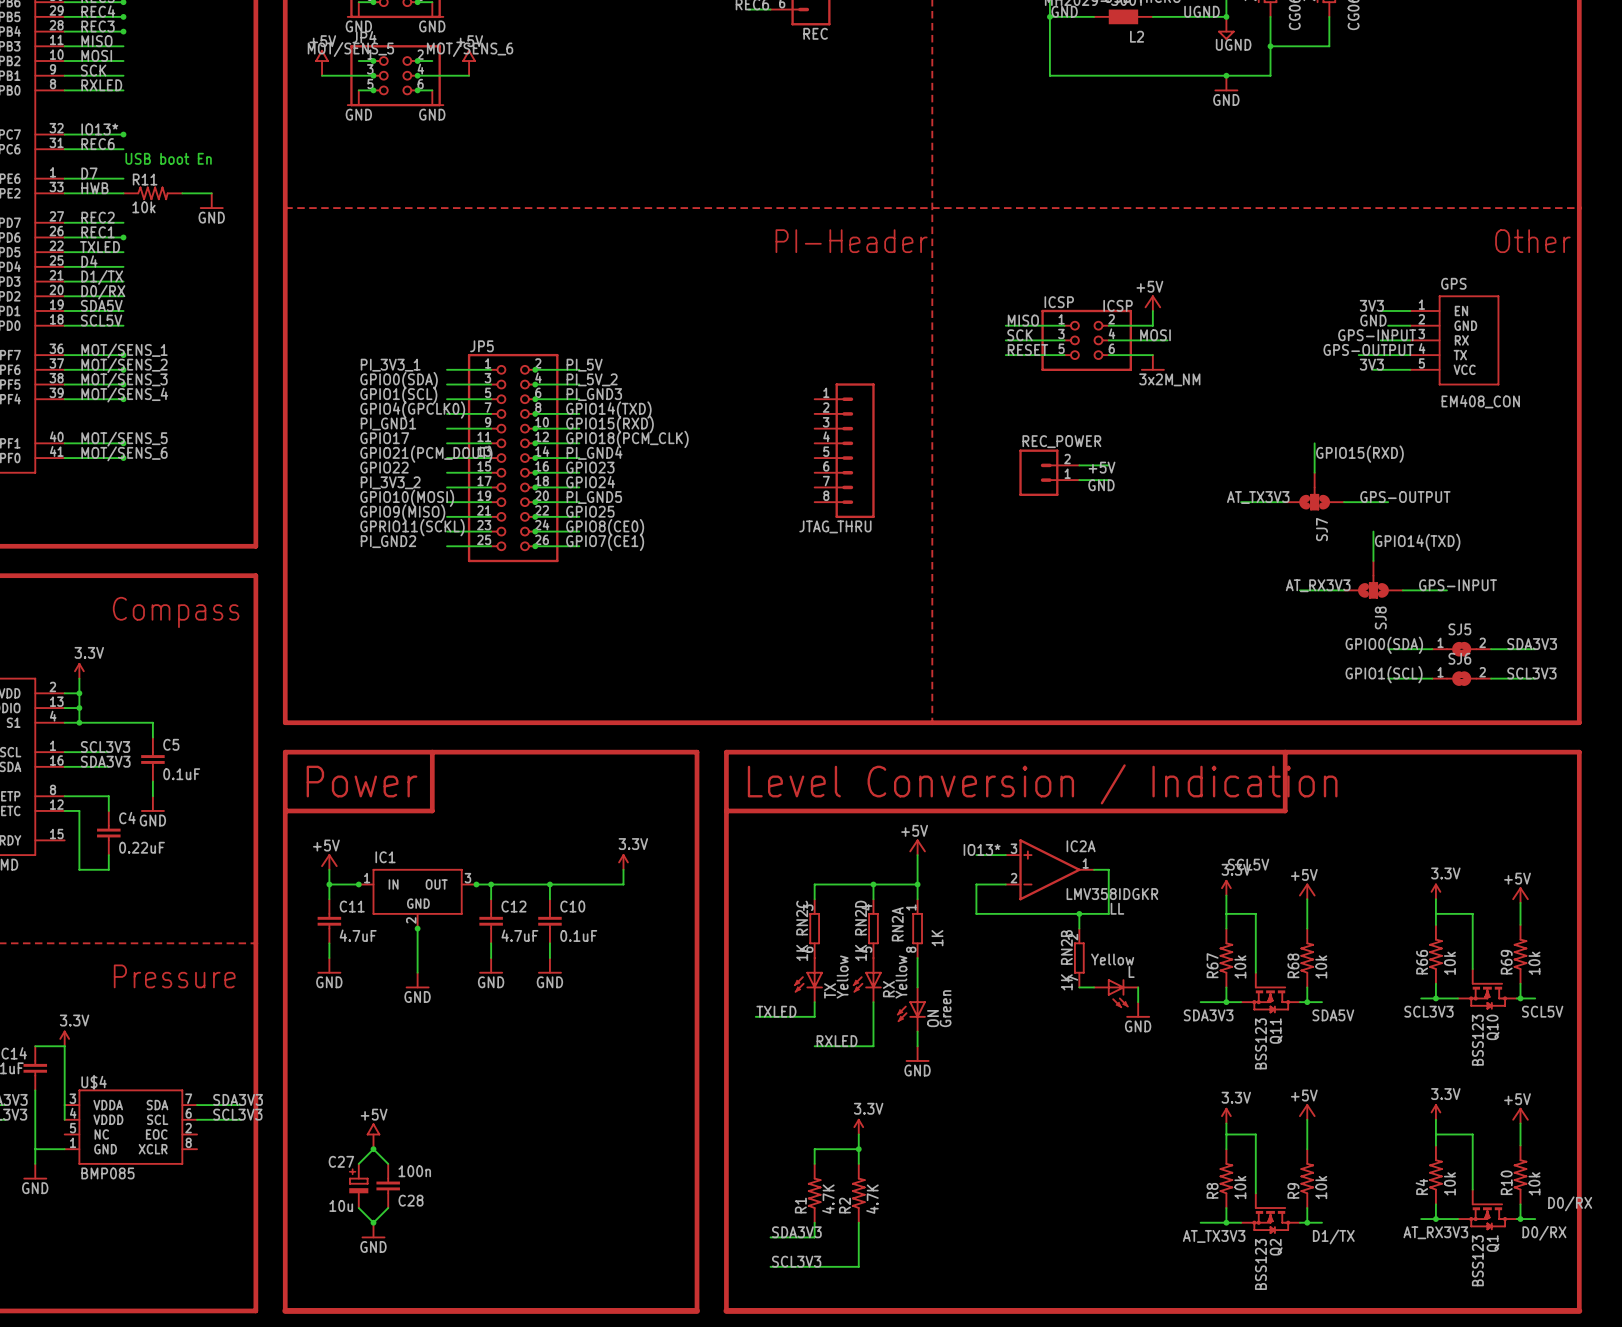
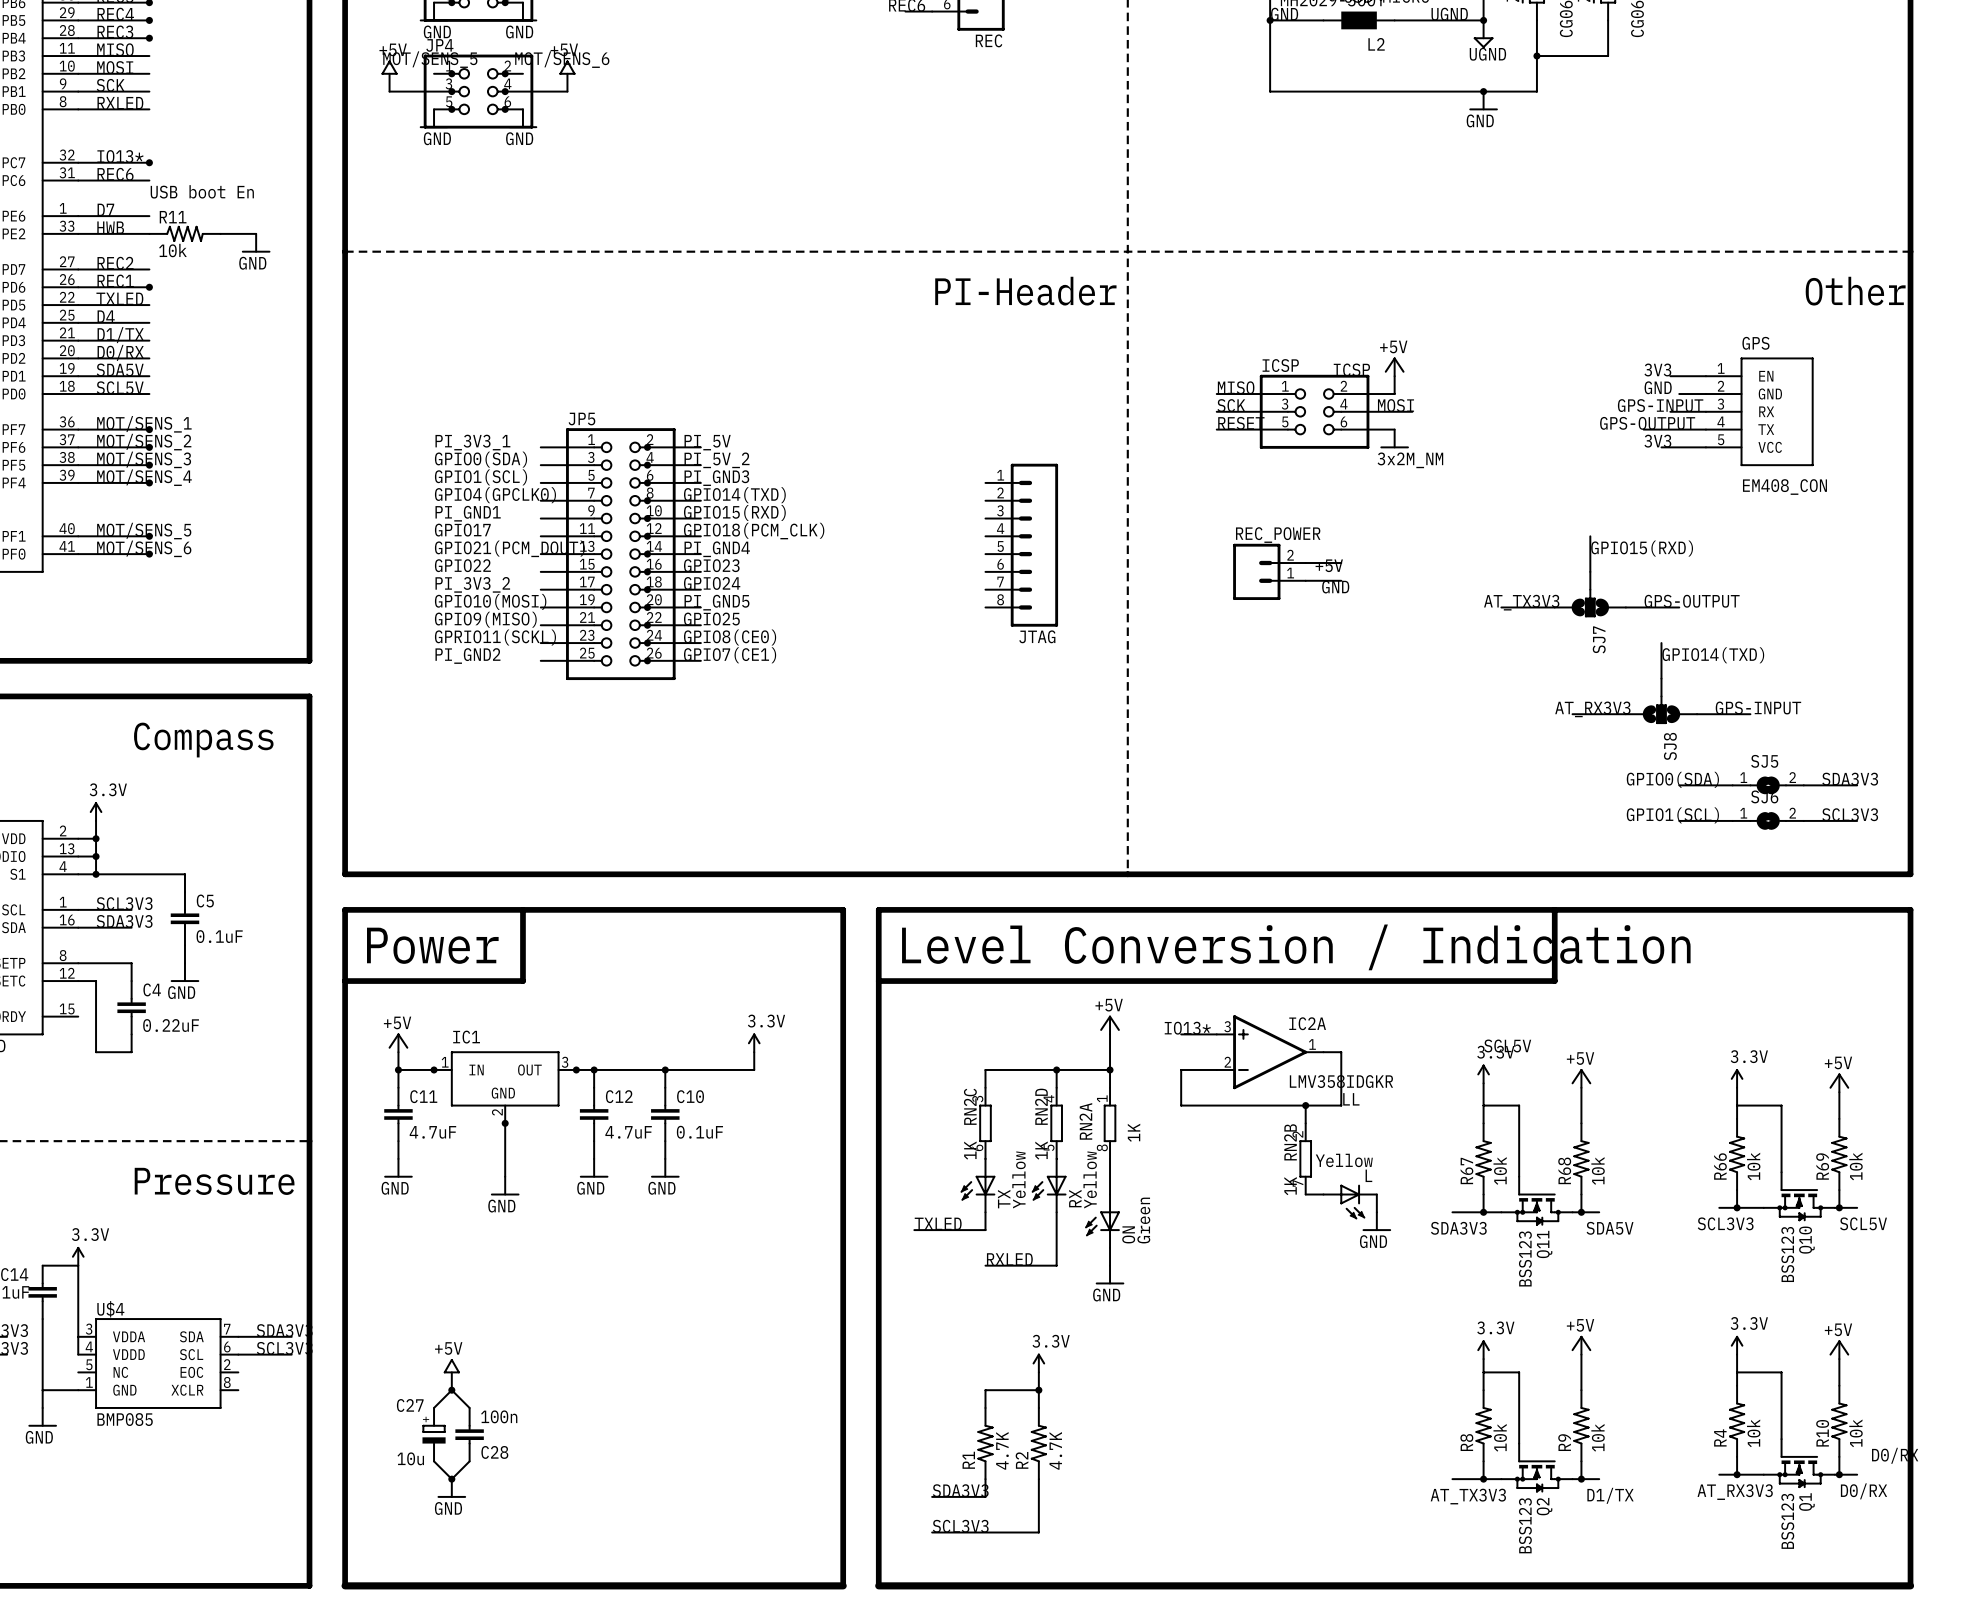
JTAG_THRU name: JTAG_THRU (835, 526) -> JTAG (1037, 636)

